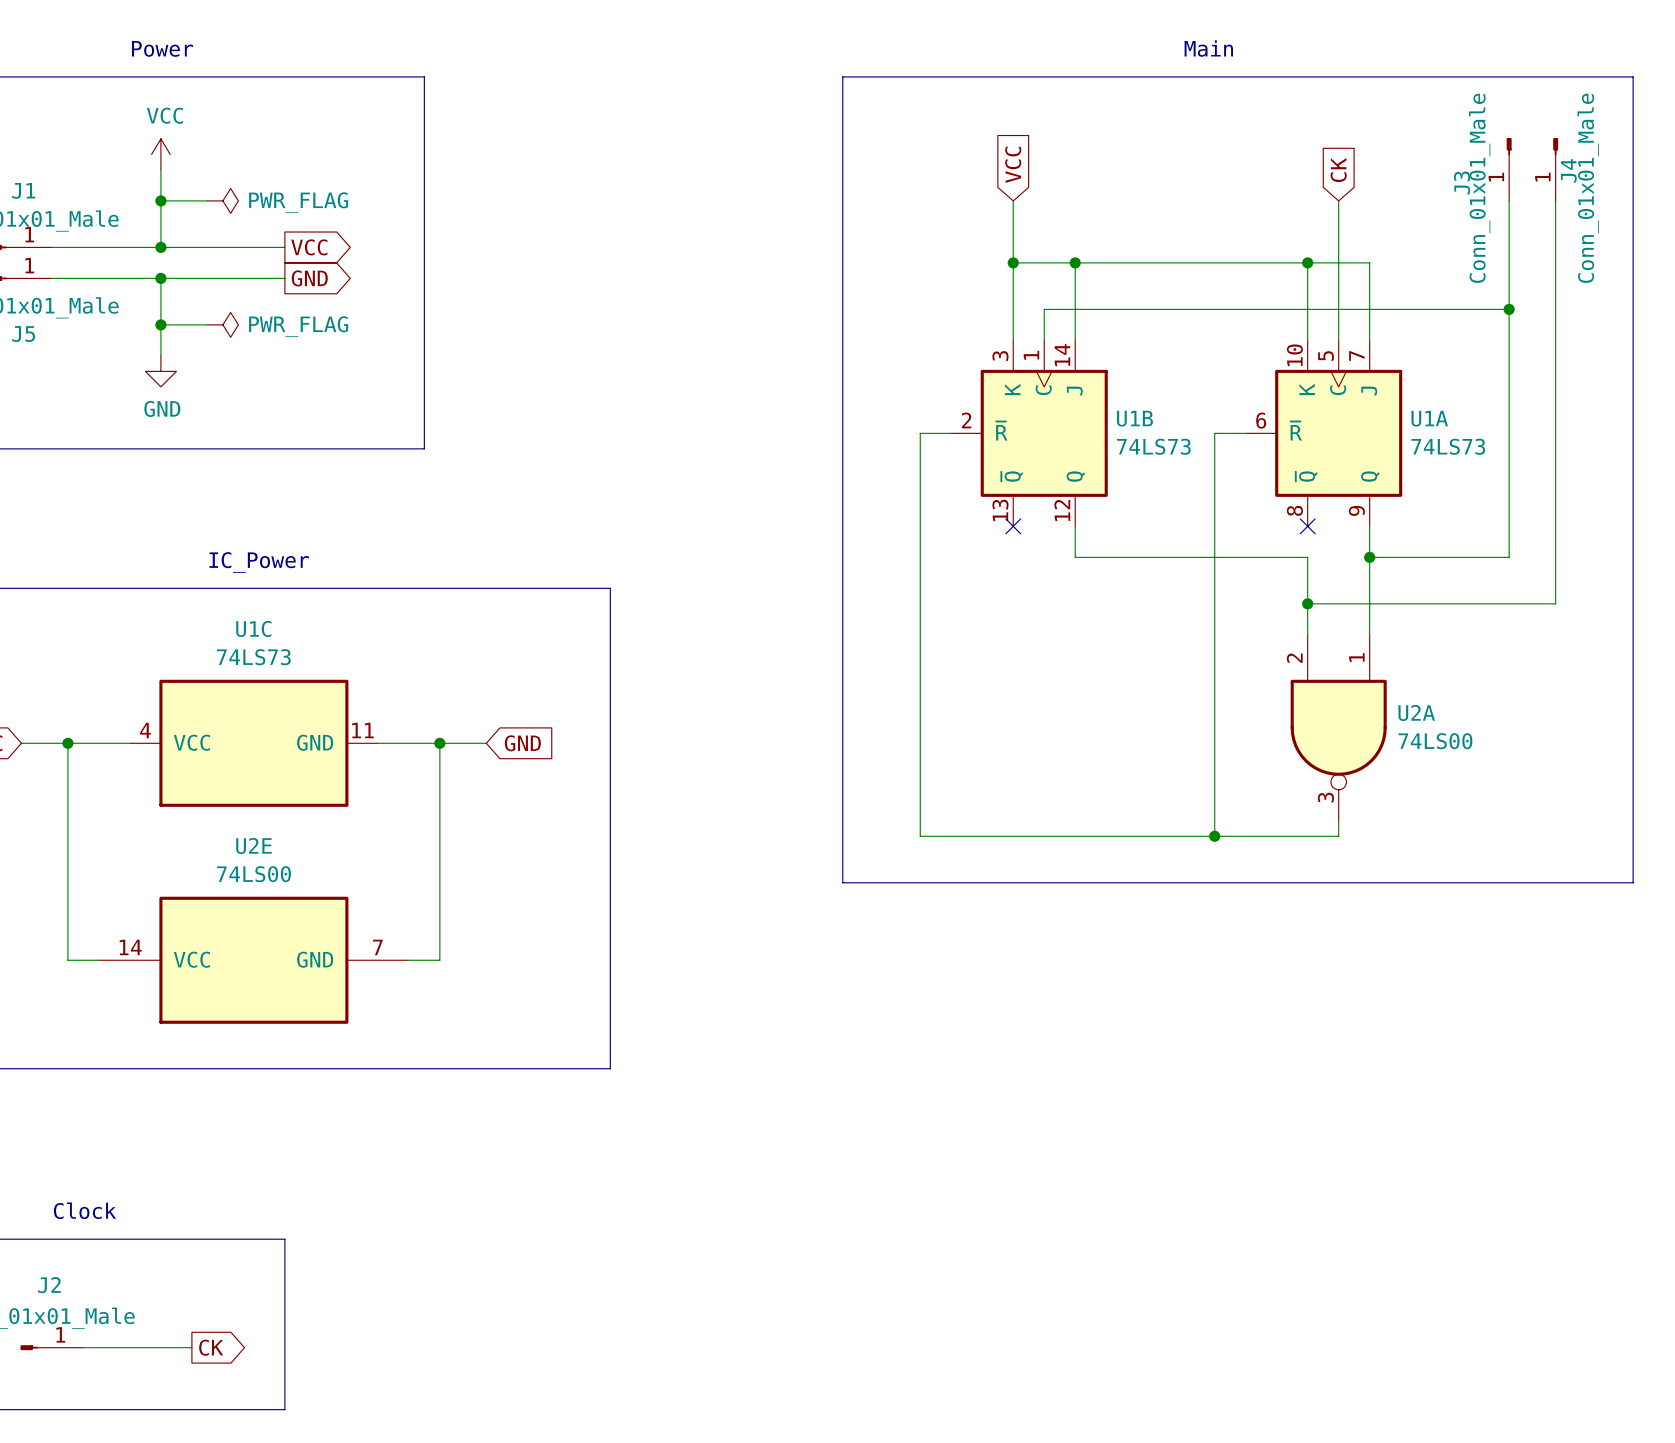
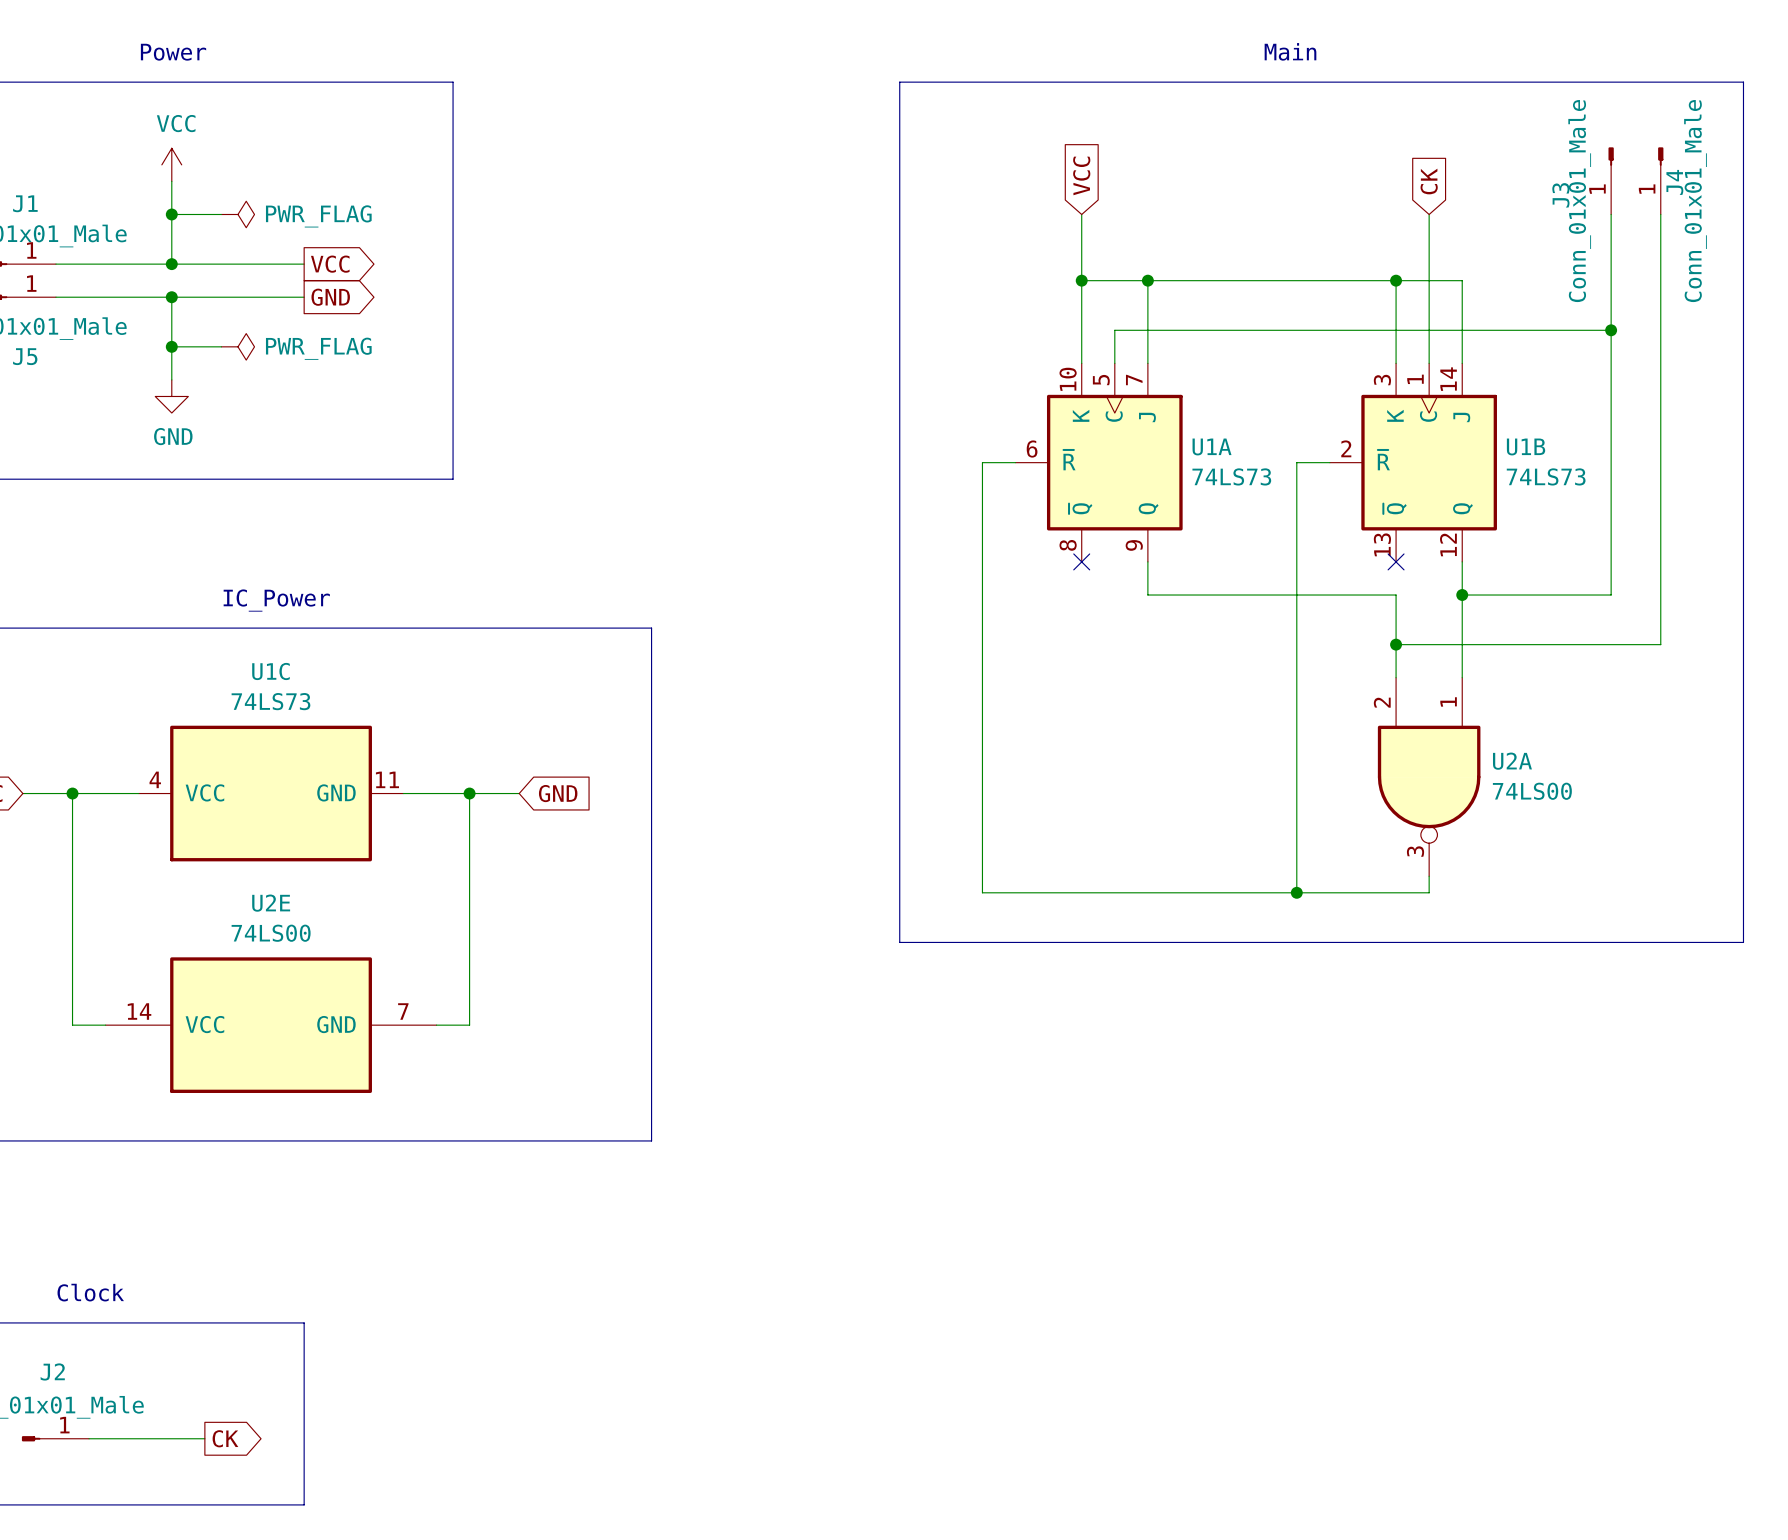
U1B position: (1029, 433) -> (1413, 462)
U1A position: (1323, 433) -> (1099, 462)

